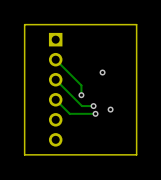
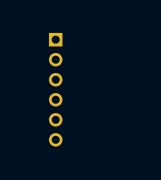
board edge: (136, 24) (24, 24) (24, 154) (136, 154) (136, 24) -> none
track: (55, 59) (81, 85) (81, 95) -> none
via: (102, 72) -> none
track: (55, 79) (82, 106) (93, 106) -> none
via: (81, 95) -> none
track: (55, 99) (69, 113) (95, 113) -> none
via: (93, 106) -> none
via: (110, 109) -> none
via: (95, 113) -> none

